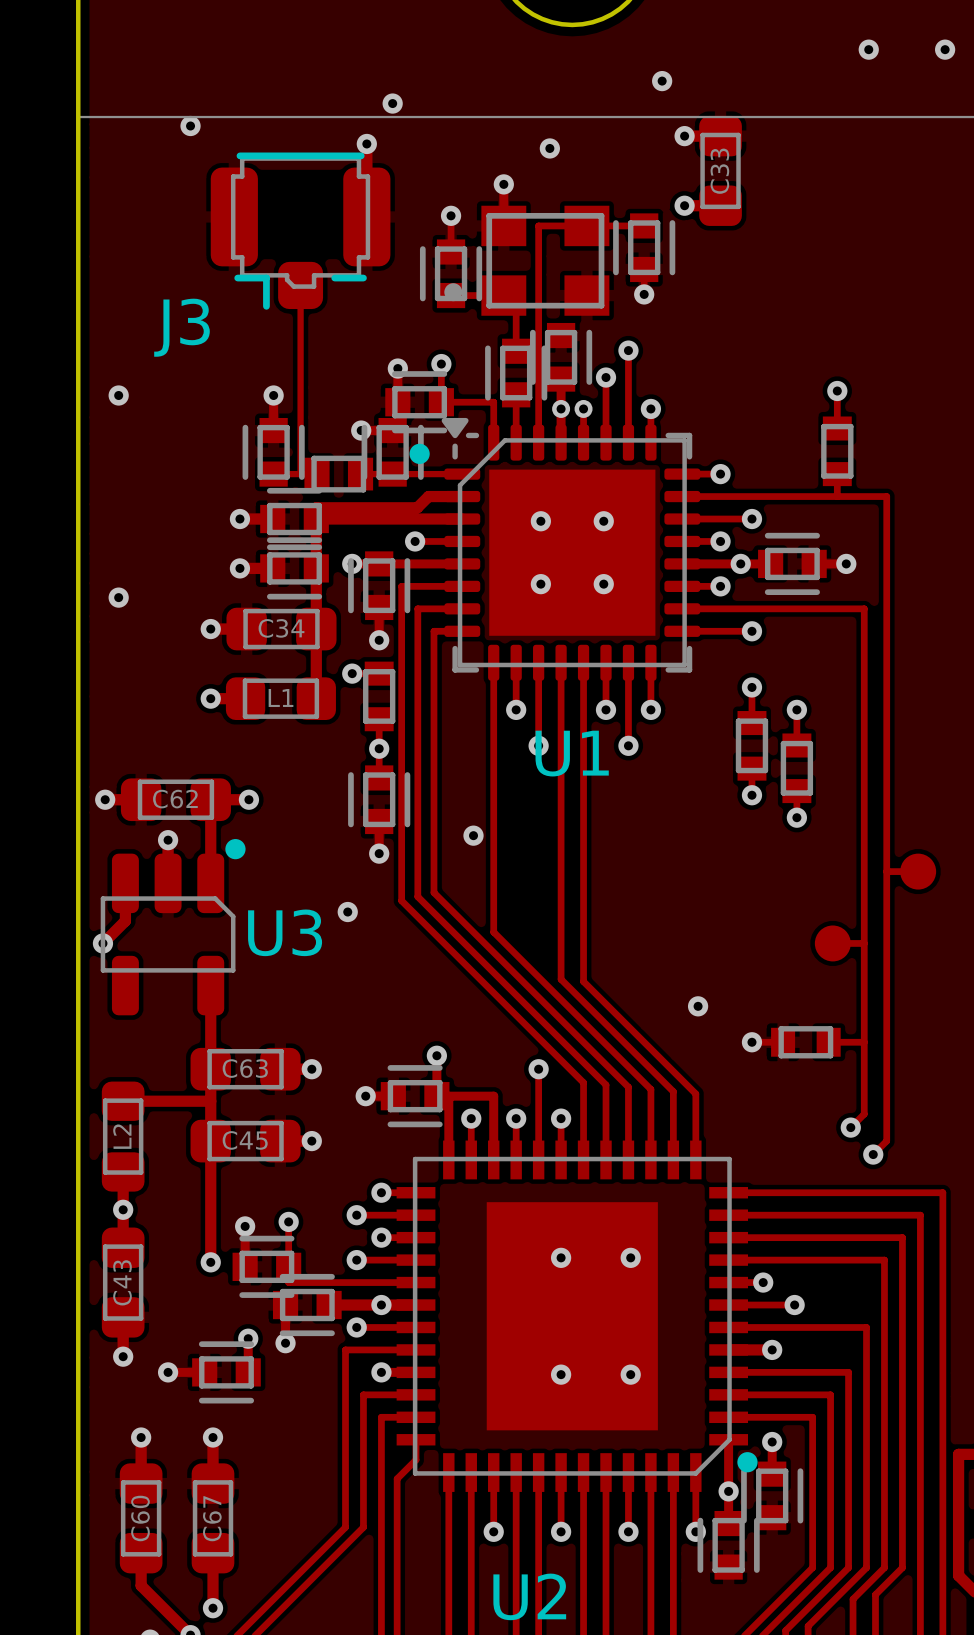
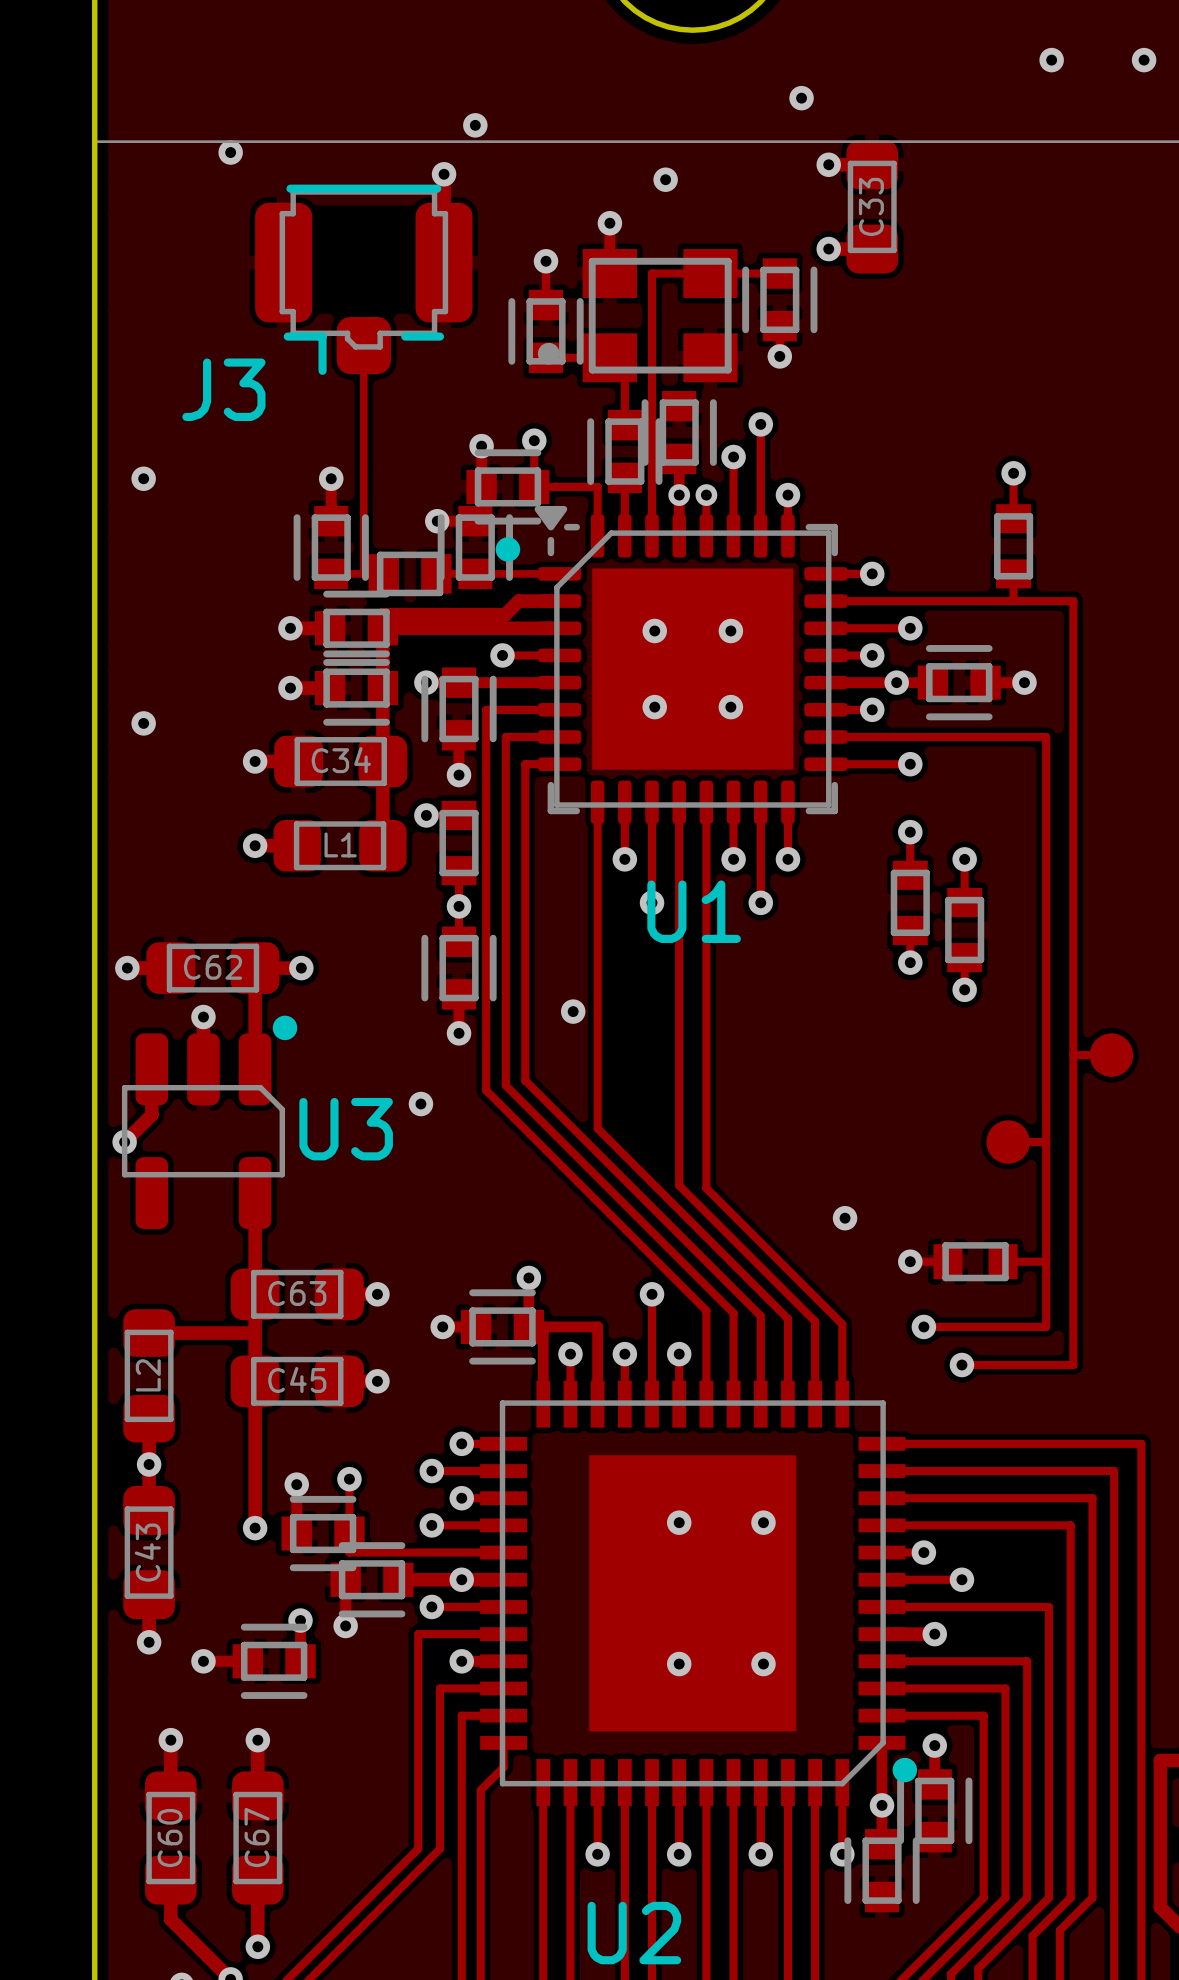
via: none -> (923, 1326)
track: (864, 1096) (864, 1114) (850, 1127) -> (1046, 1326) (923, 1326)
via: none -> (961, 1365)
via: (850, 1127) -> none
track: (886, 1127) (886, 1141) (873, 1154) -> (1073, 1365) (961, 1365)
via: (873, 1154) -> none

